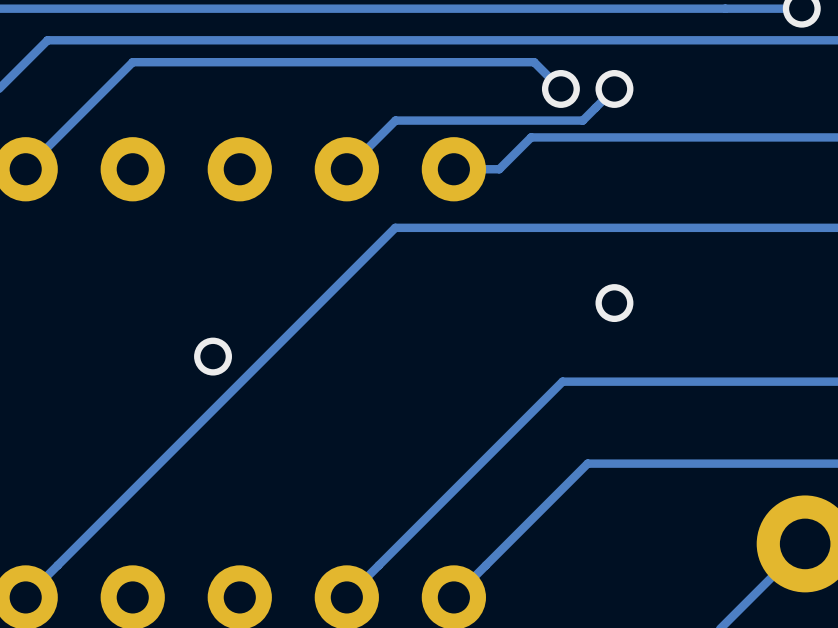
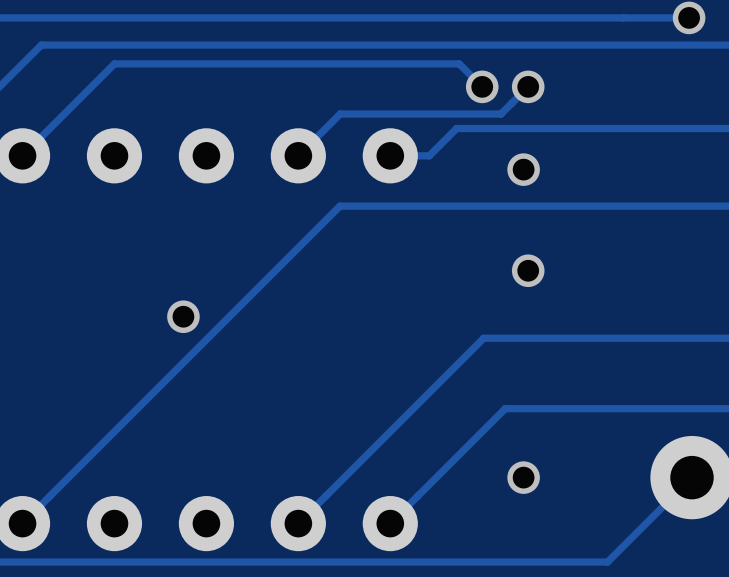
via: none -> (523, 169)
via: none -> (523, 477)

